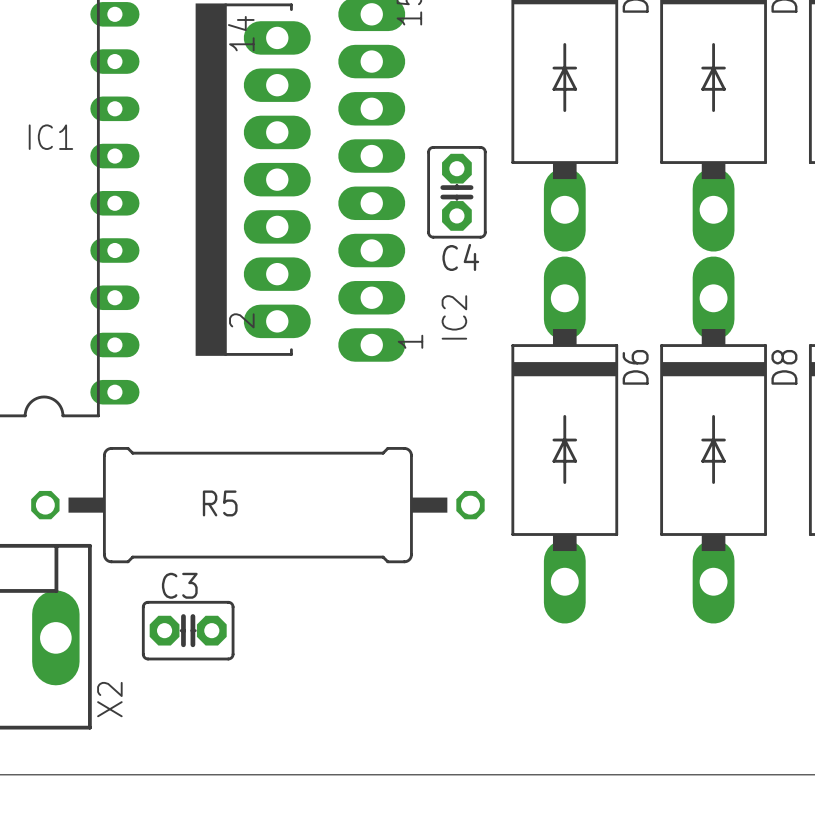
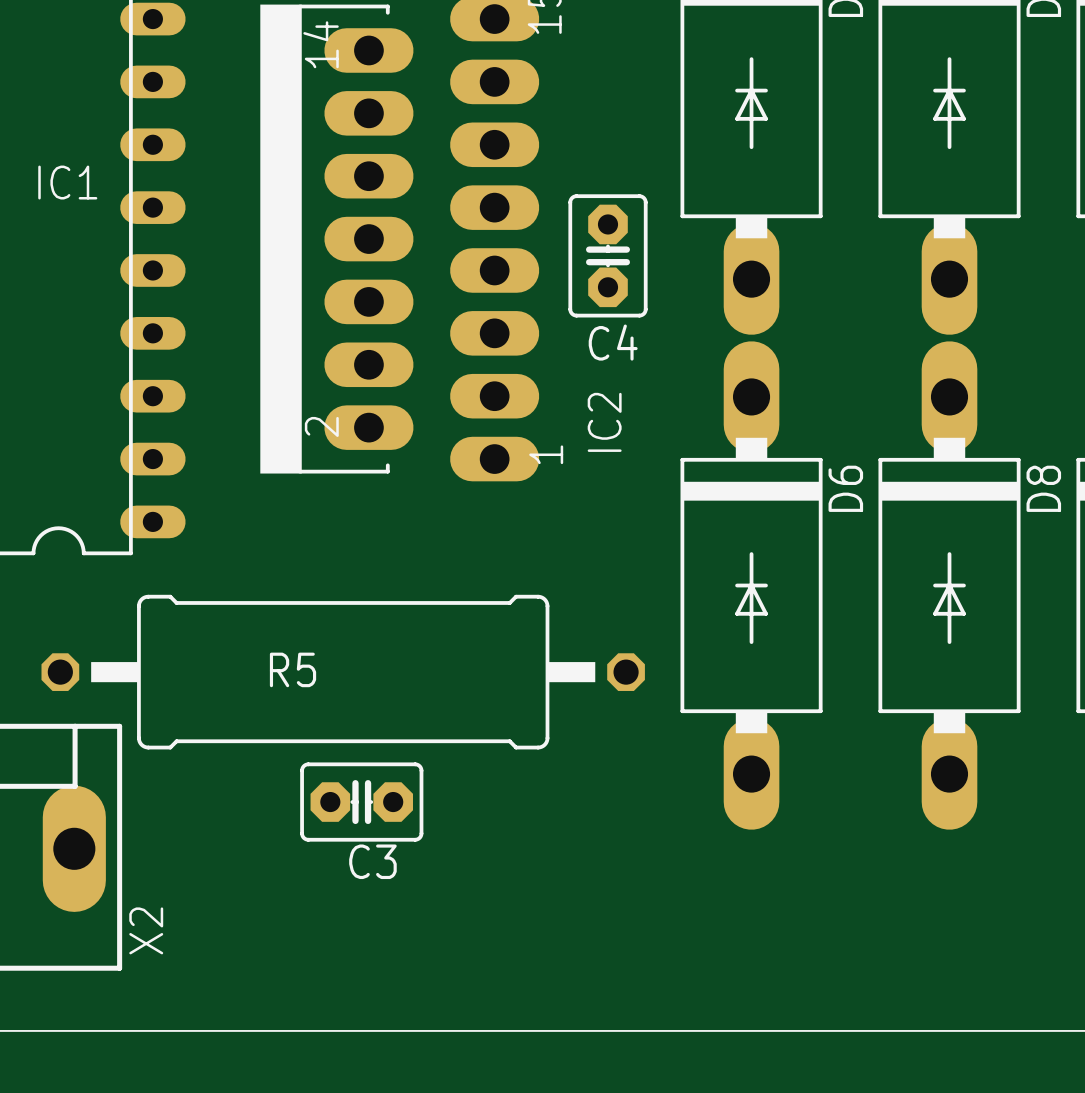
C3 name position: C3 (179, 585) -> C3 (372, 861)
C3 position: (188, 630) -> (361, 802)

